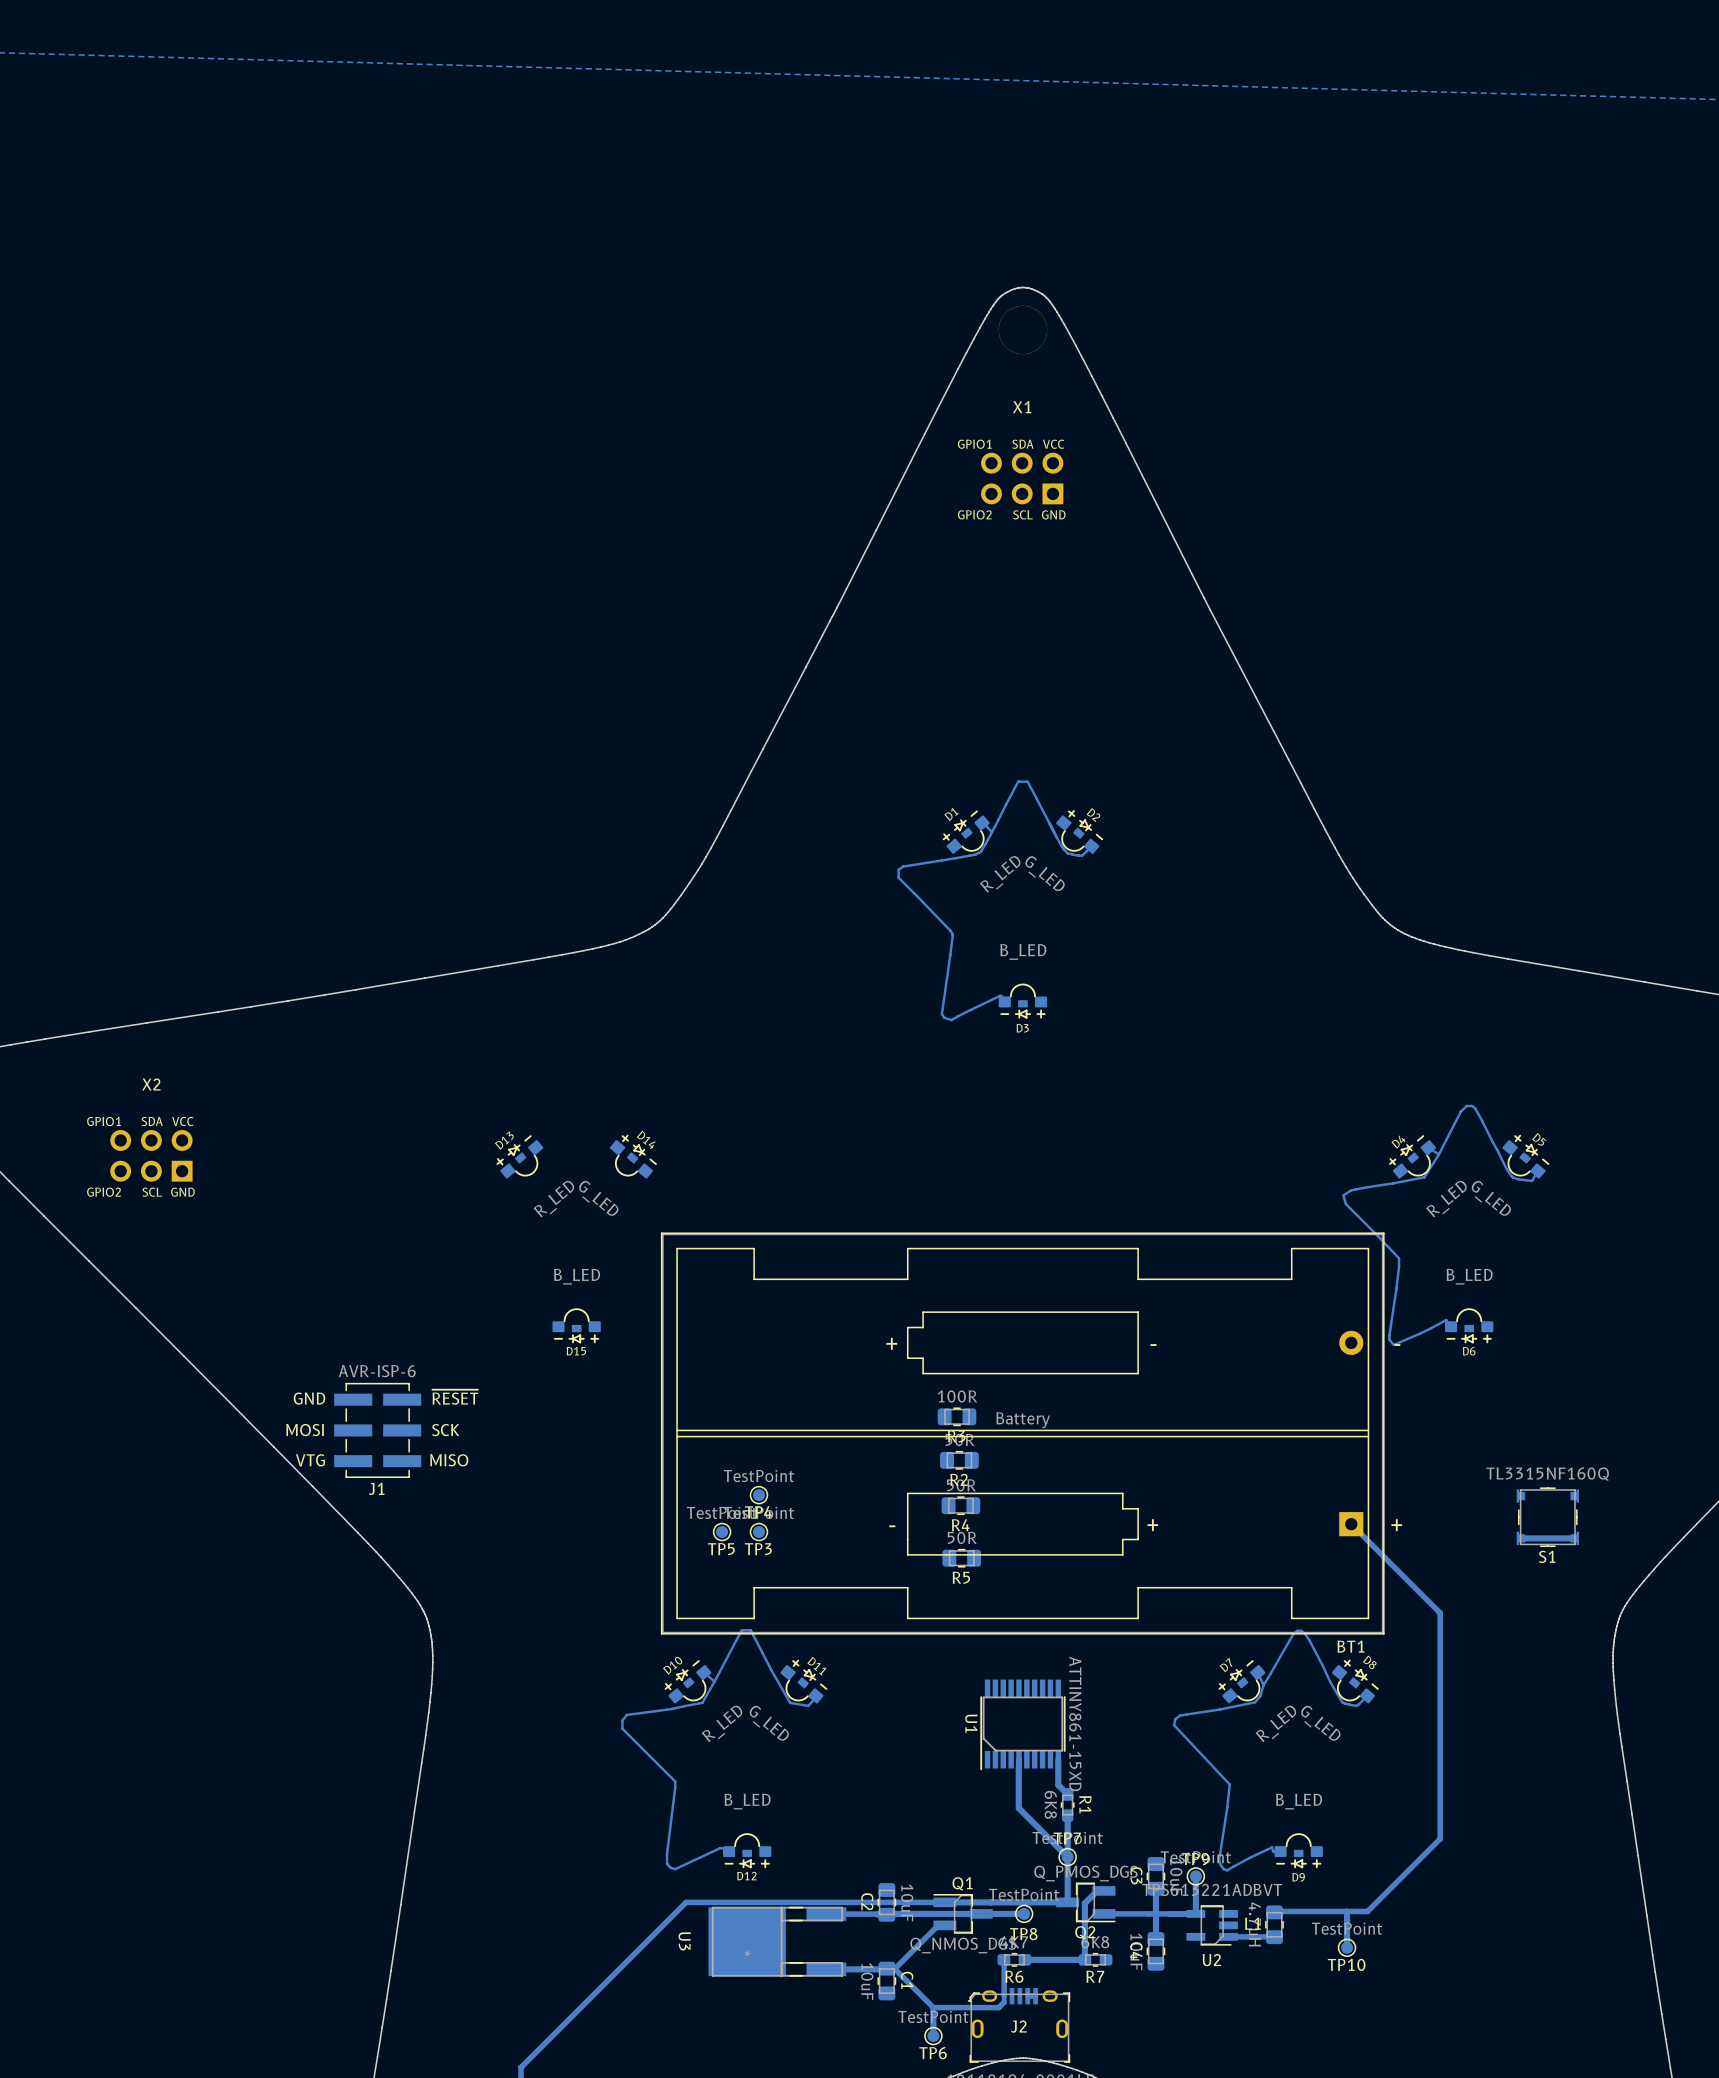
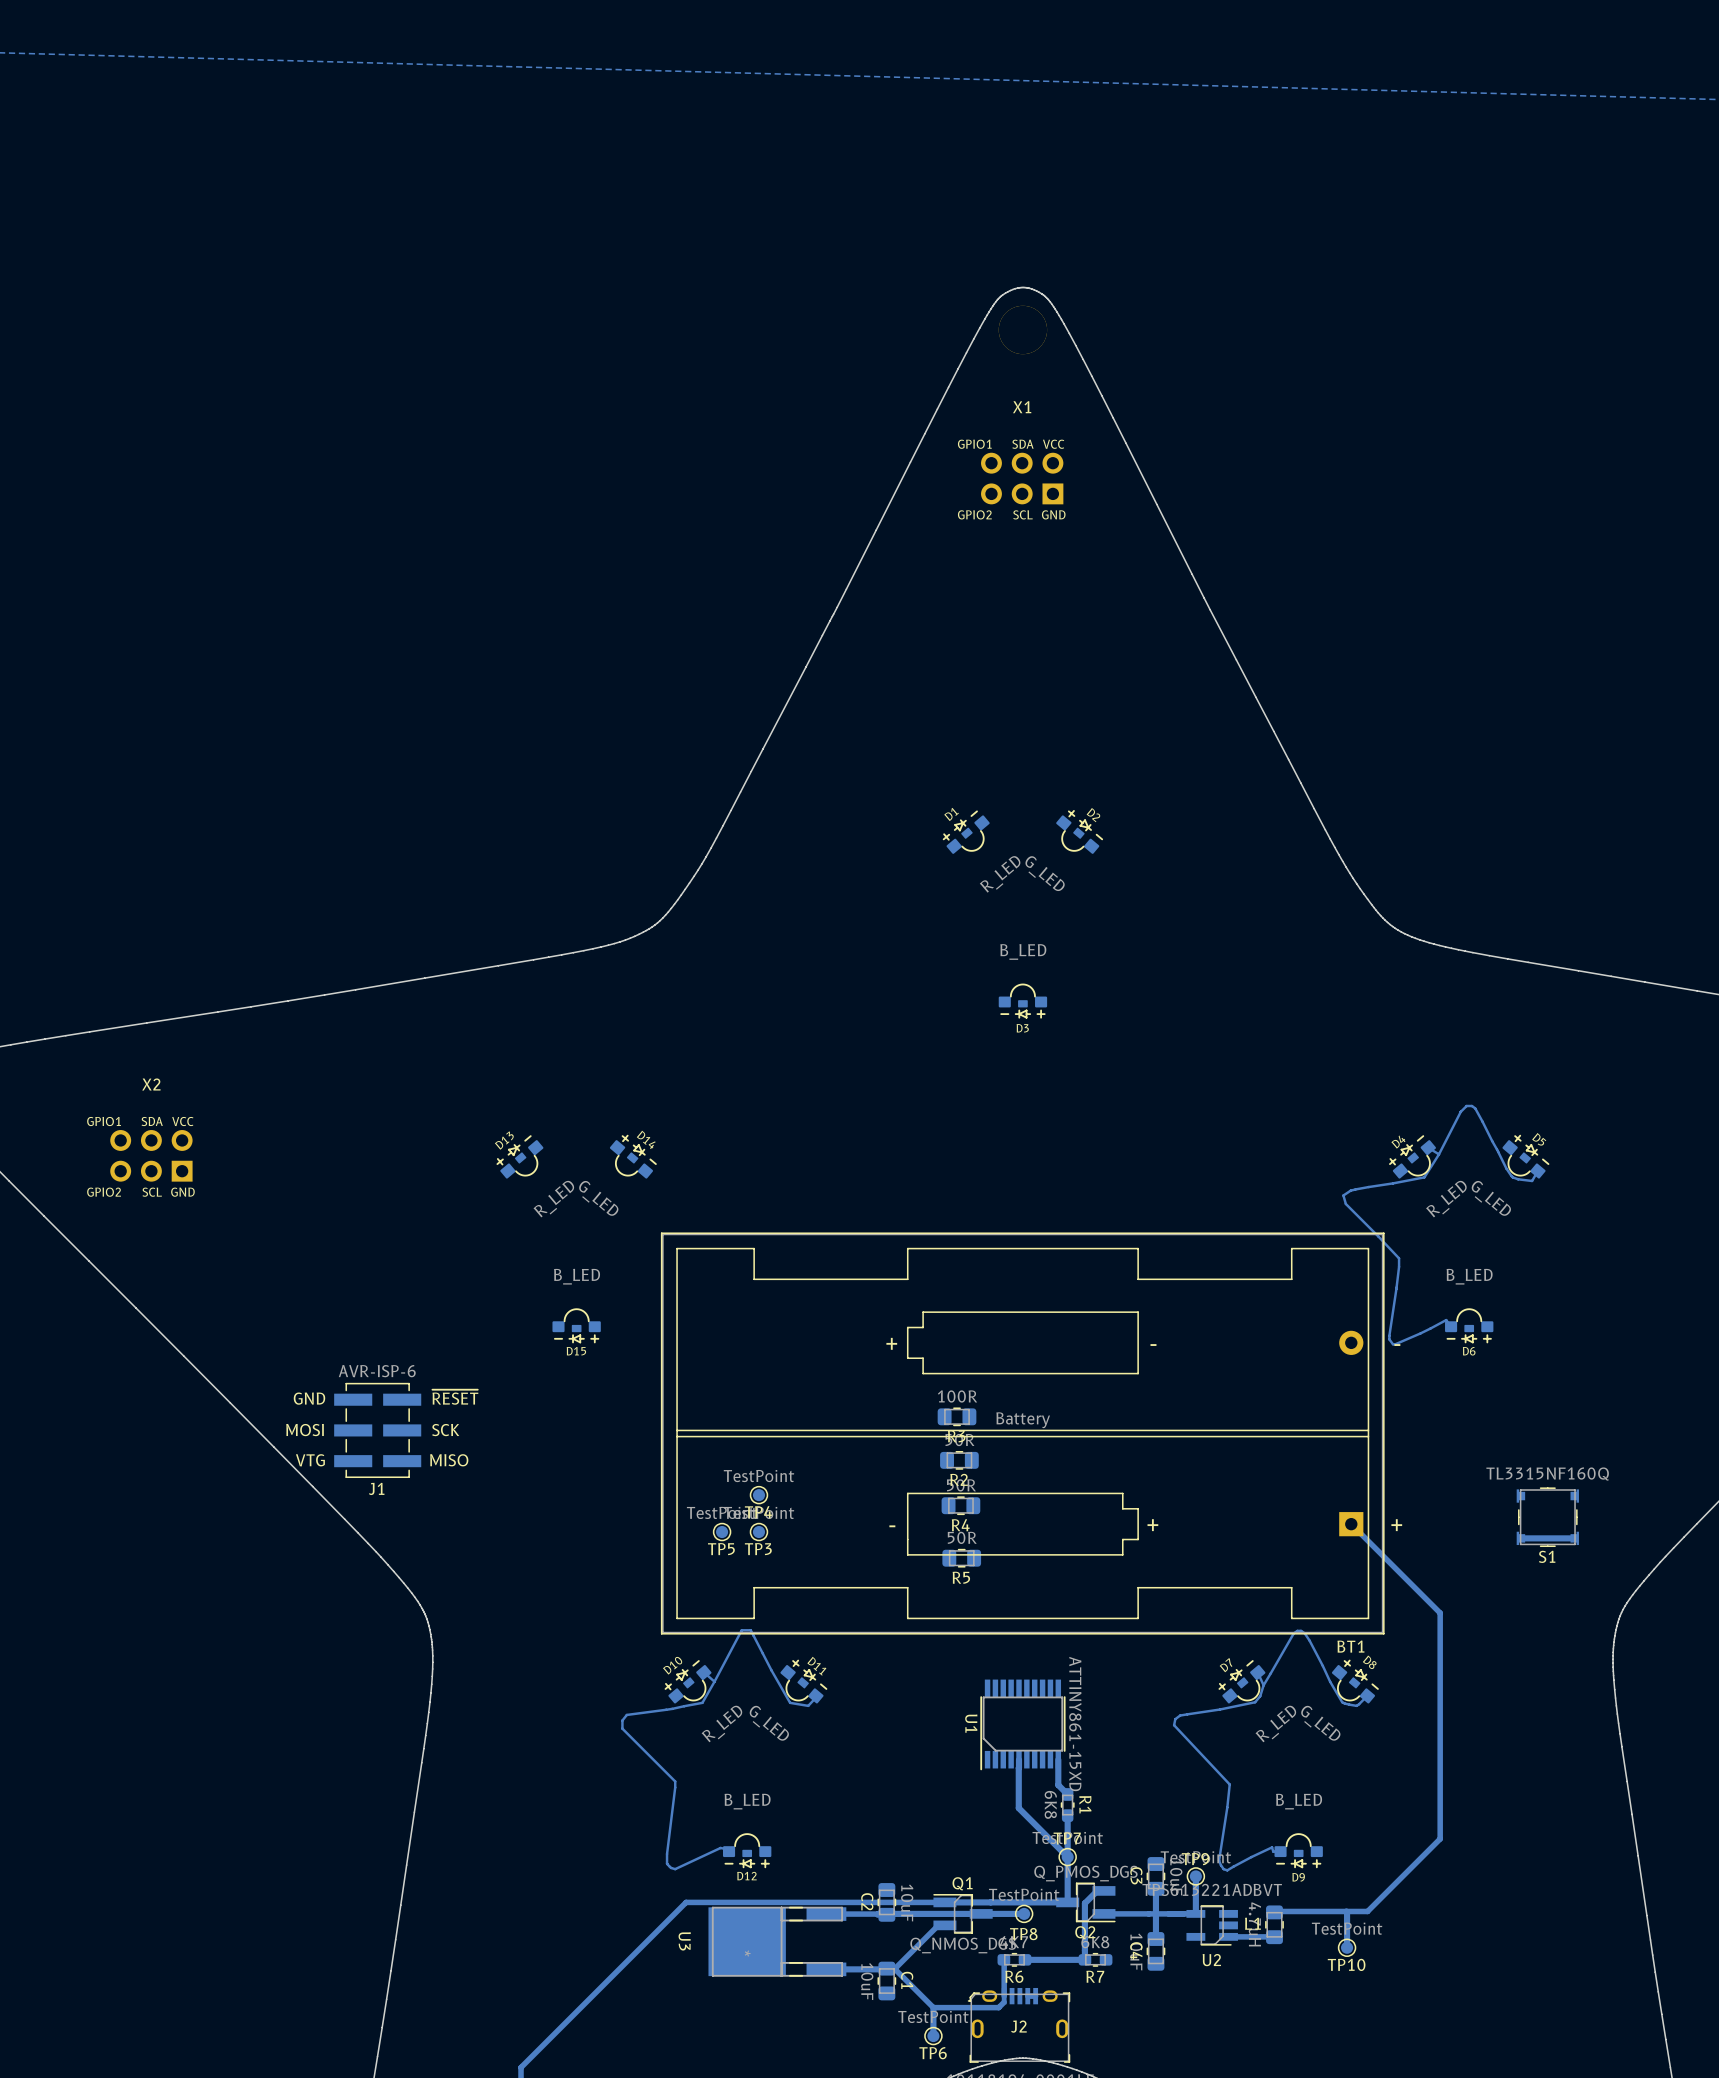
track: (1027, 781) (1018, 781) (991, 831) -> none
track: (1027, 781) (1054, 832) -> none
track: (983, 821) (991, 831) -> none
track: (1049, 823) (1067, 853) (1082, 855) (1091, 846) -> none
track: (991, 831) (980, 852) (975, 854) (903, 866) (898, 869) (898, 877) (952, 934) (941, 1014) (944, 1017) (951, 1020) (999, 995) (1004, 999) (1004, 1001) -> none

